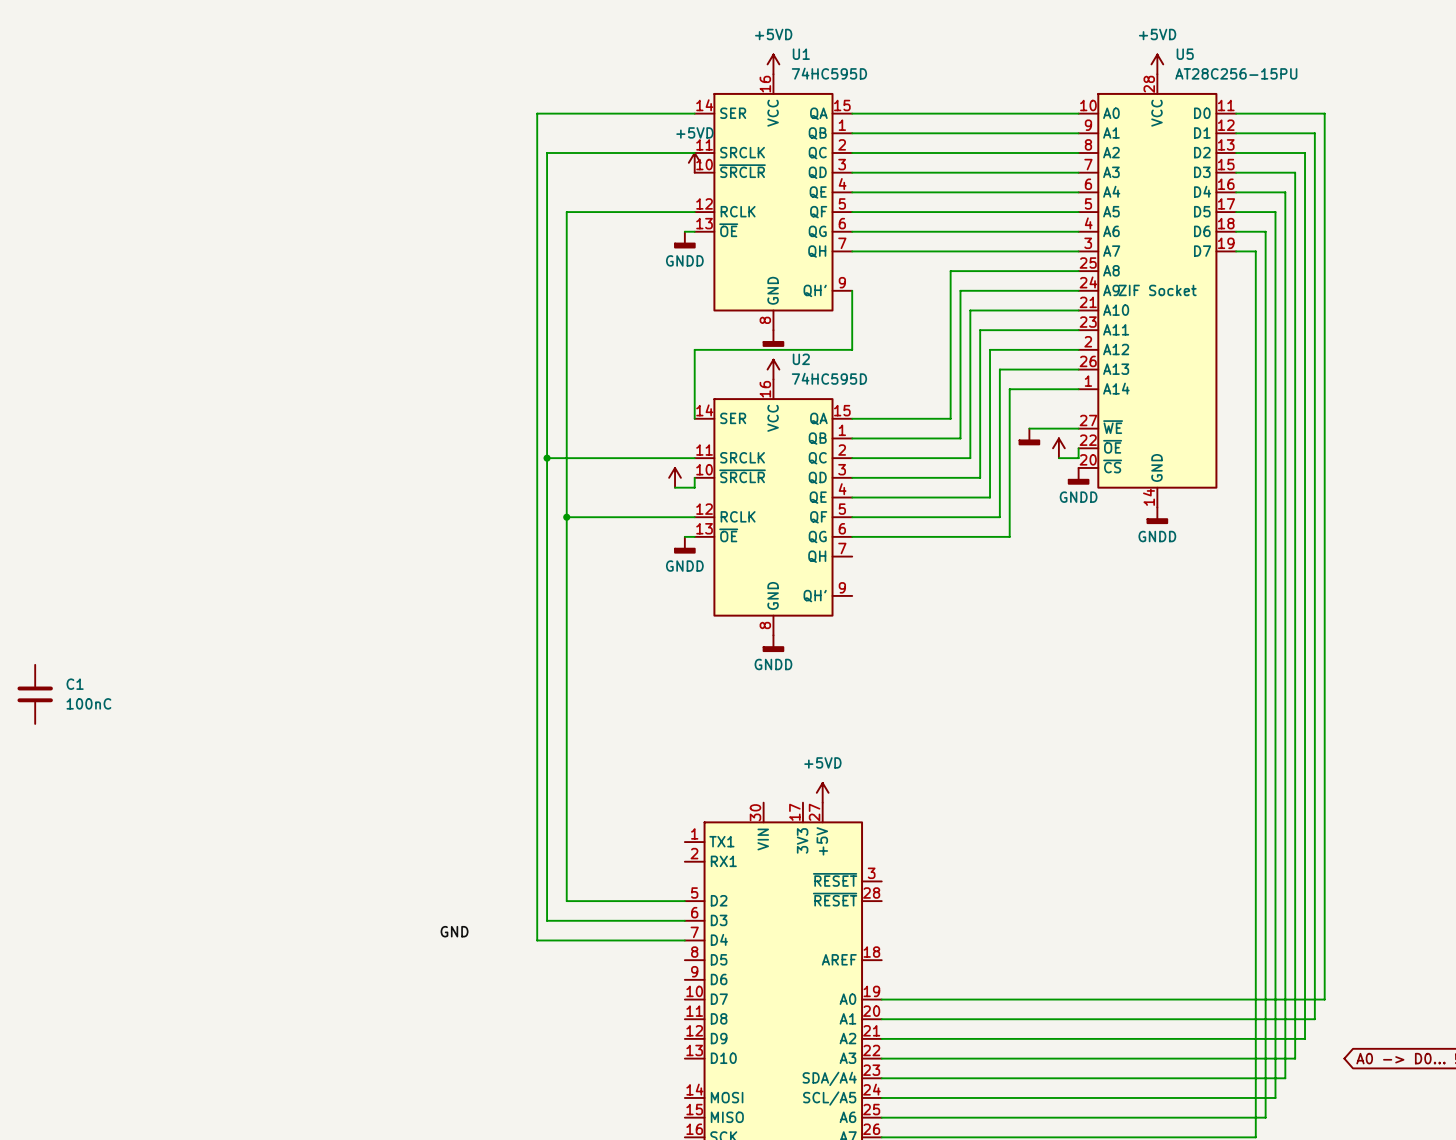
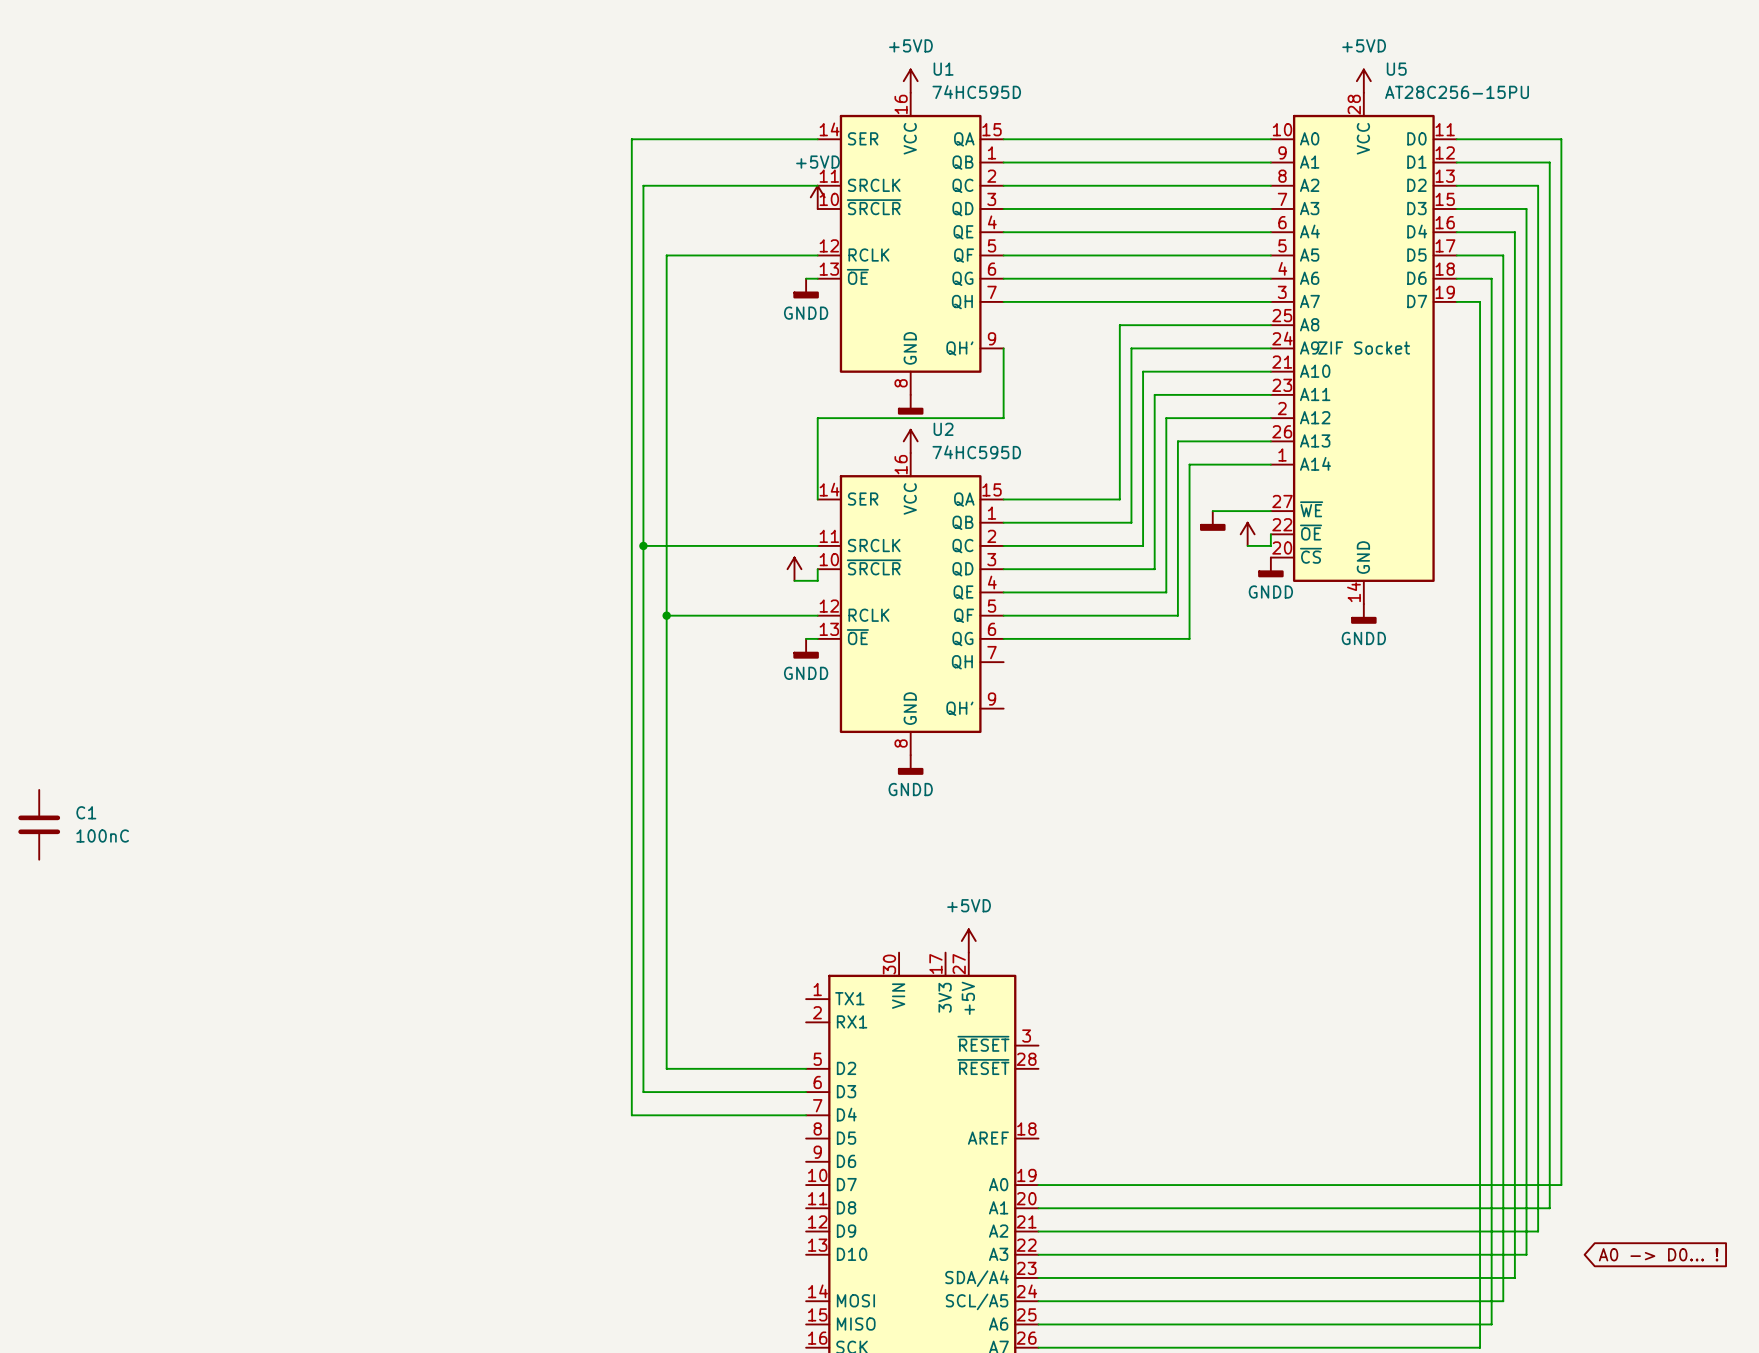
label: GND (454, 931) -> none

